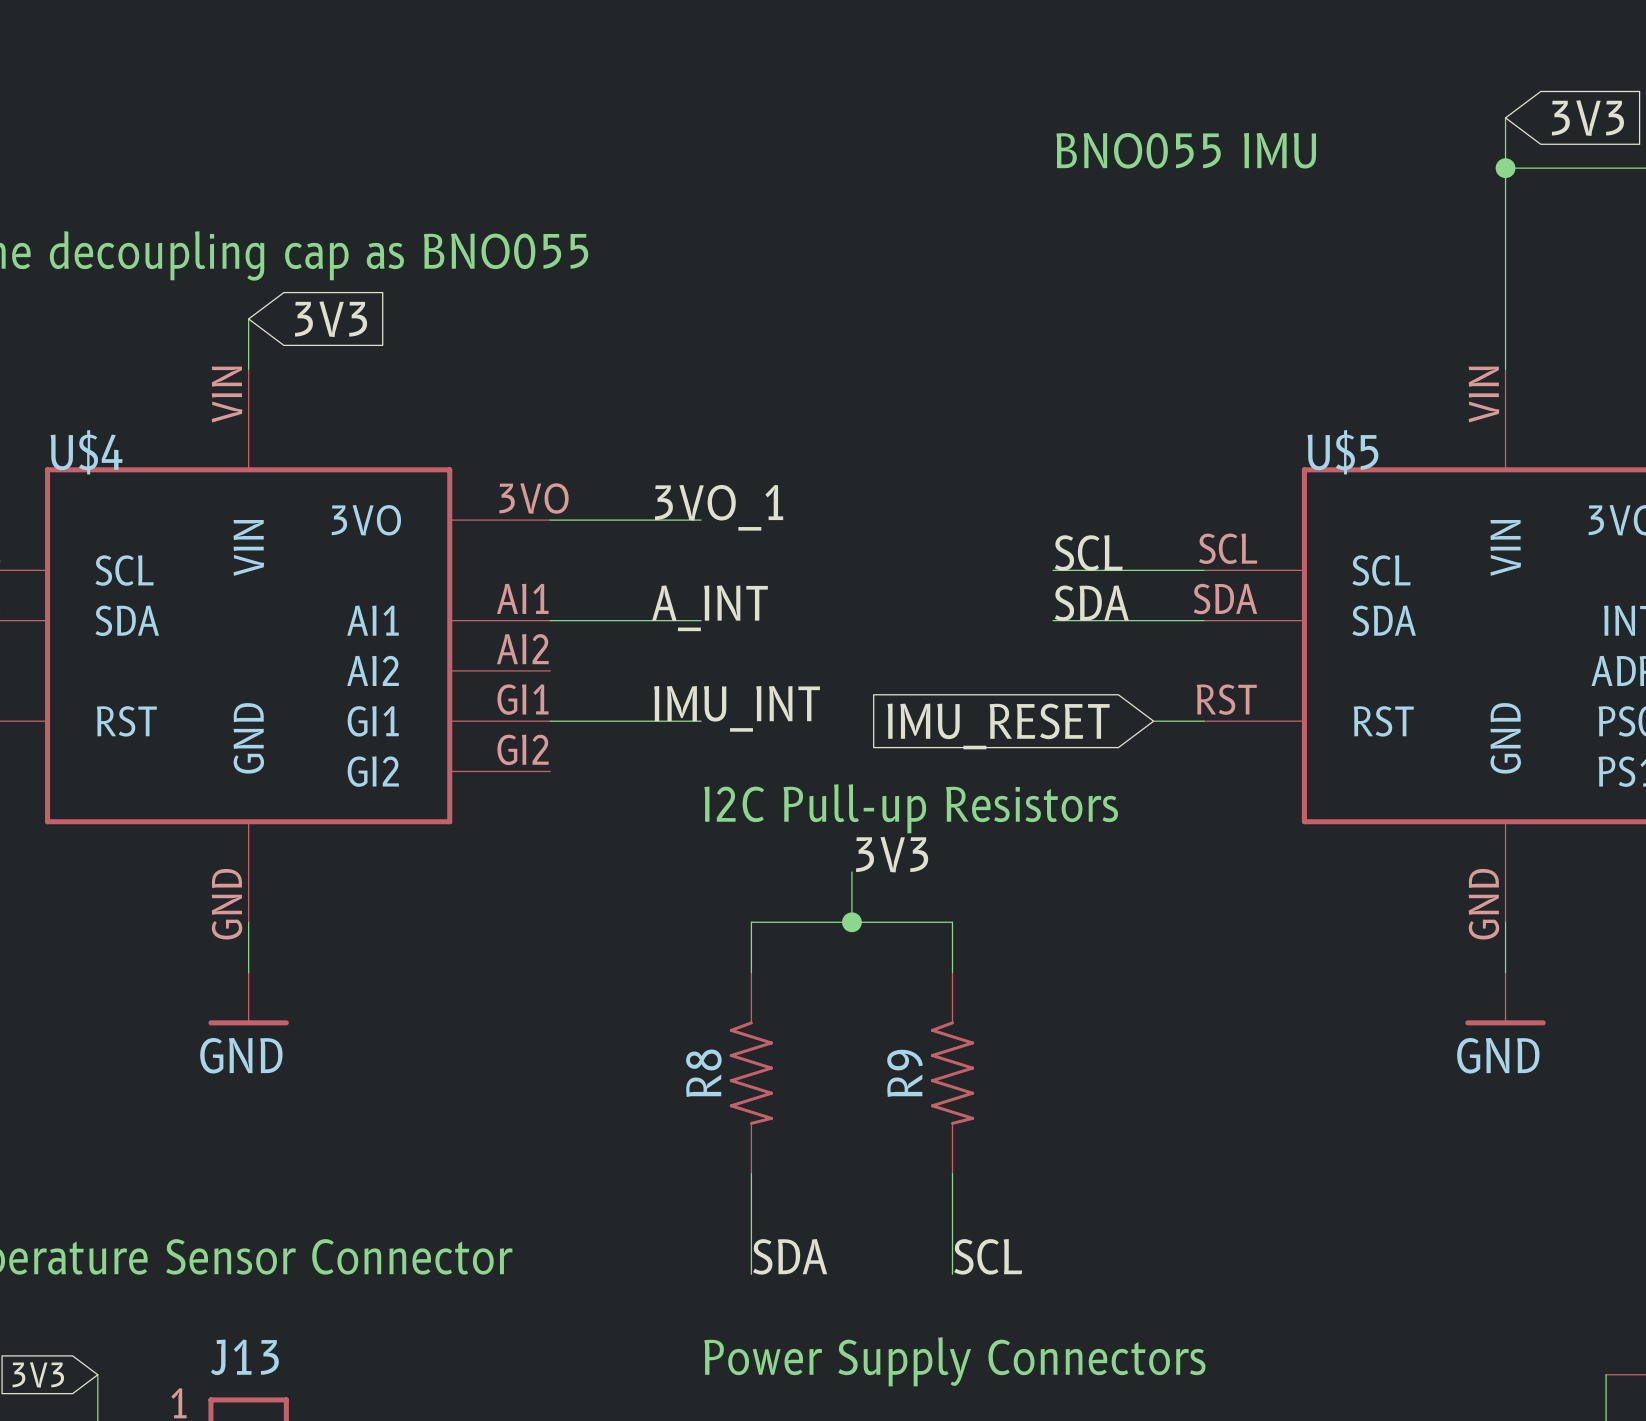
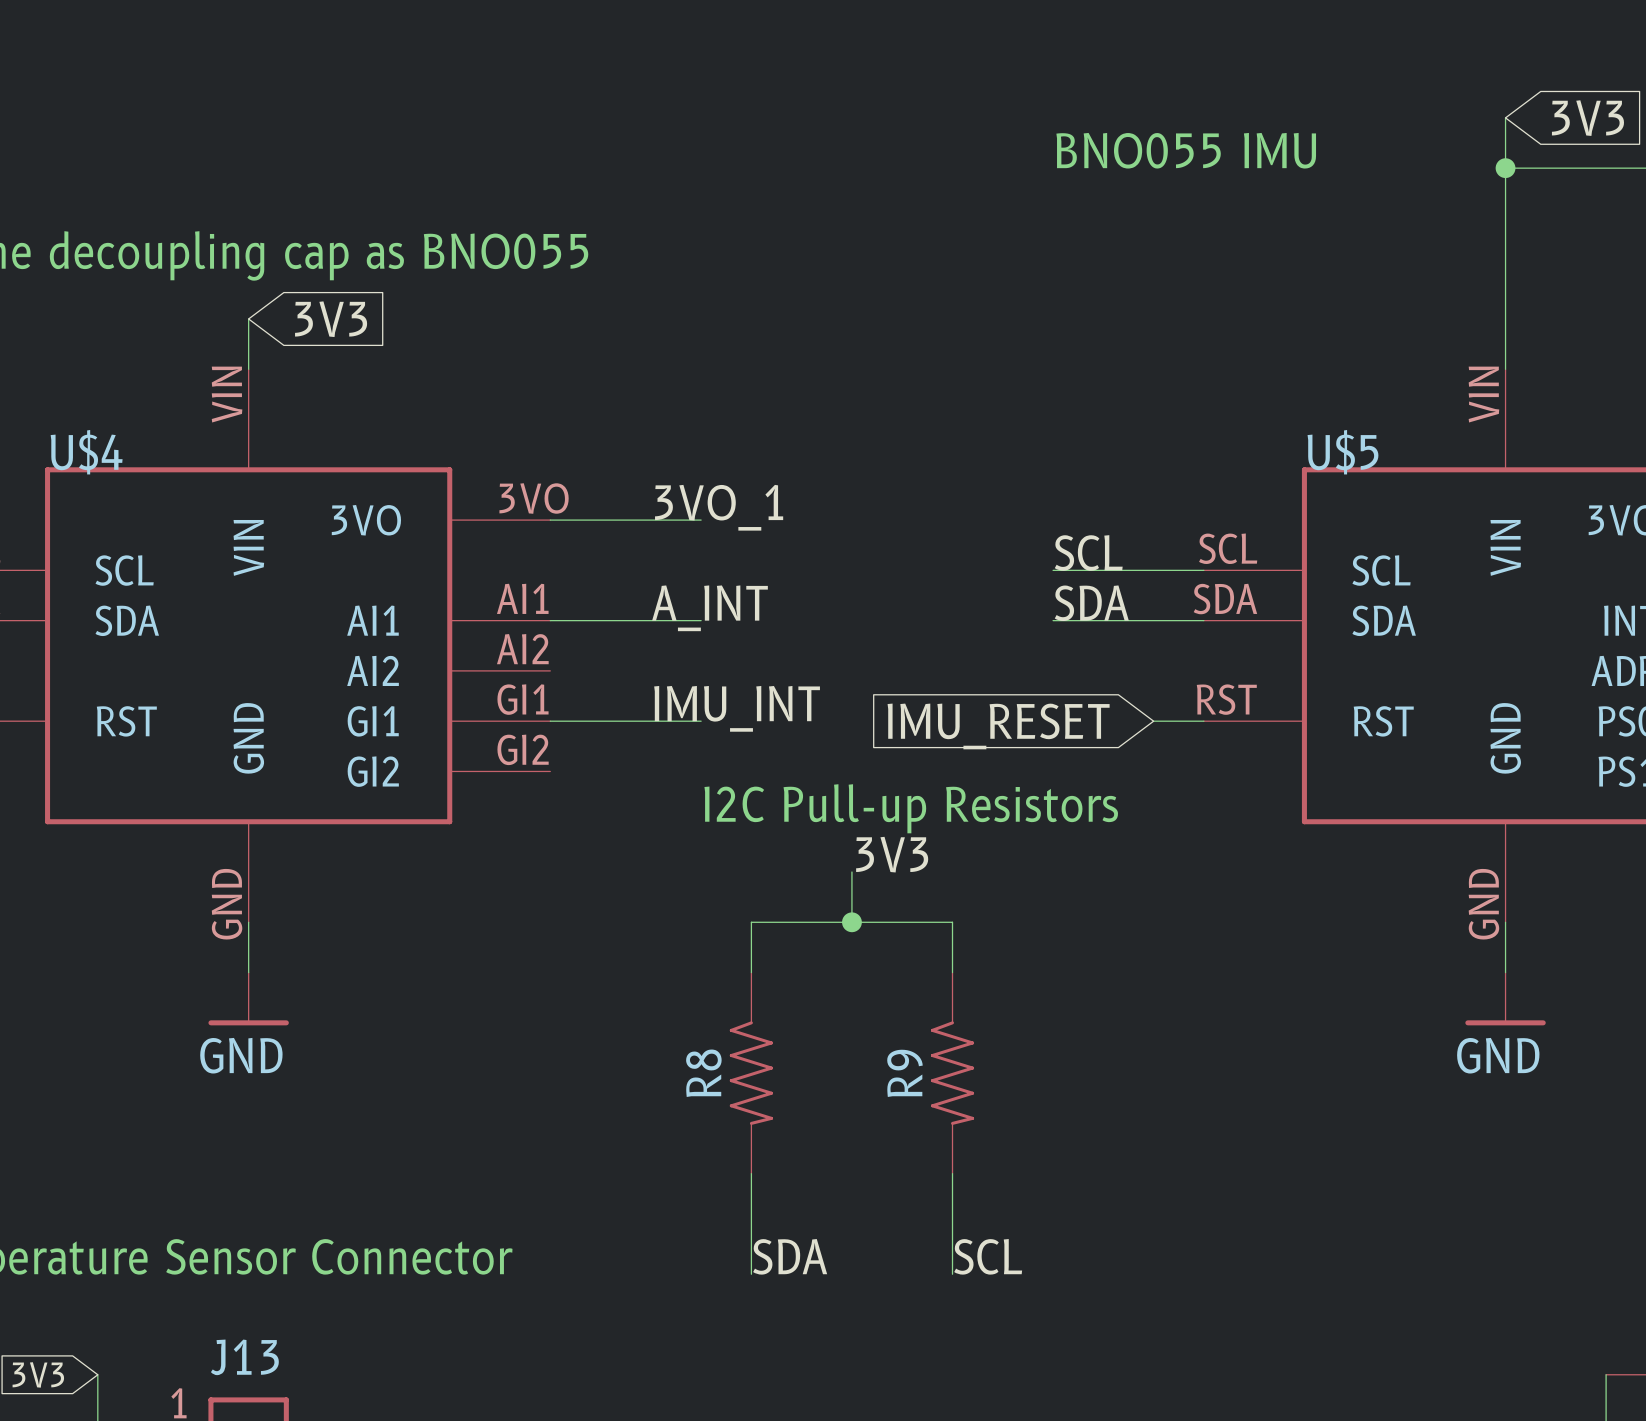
text: Power Supply Connectors (954, 1361) -> none

